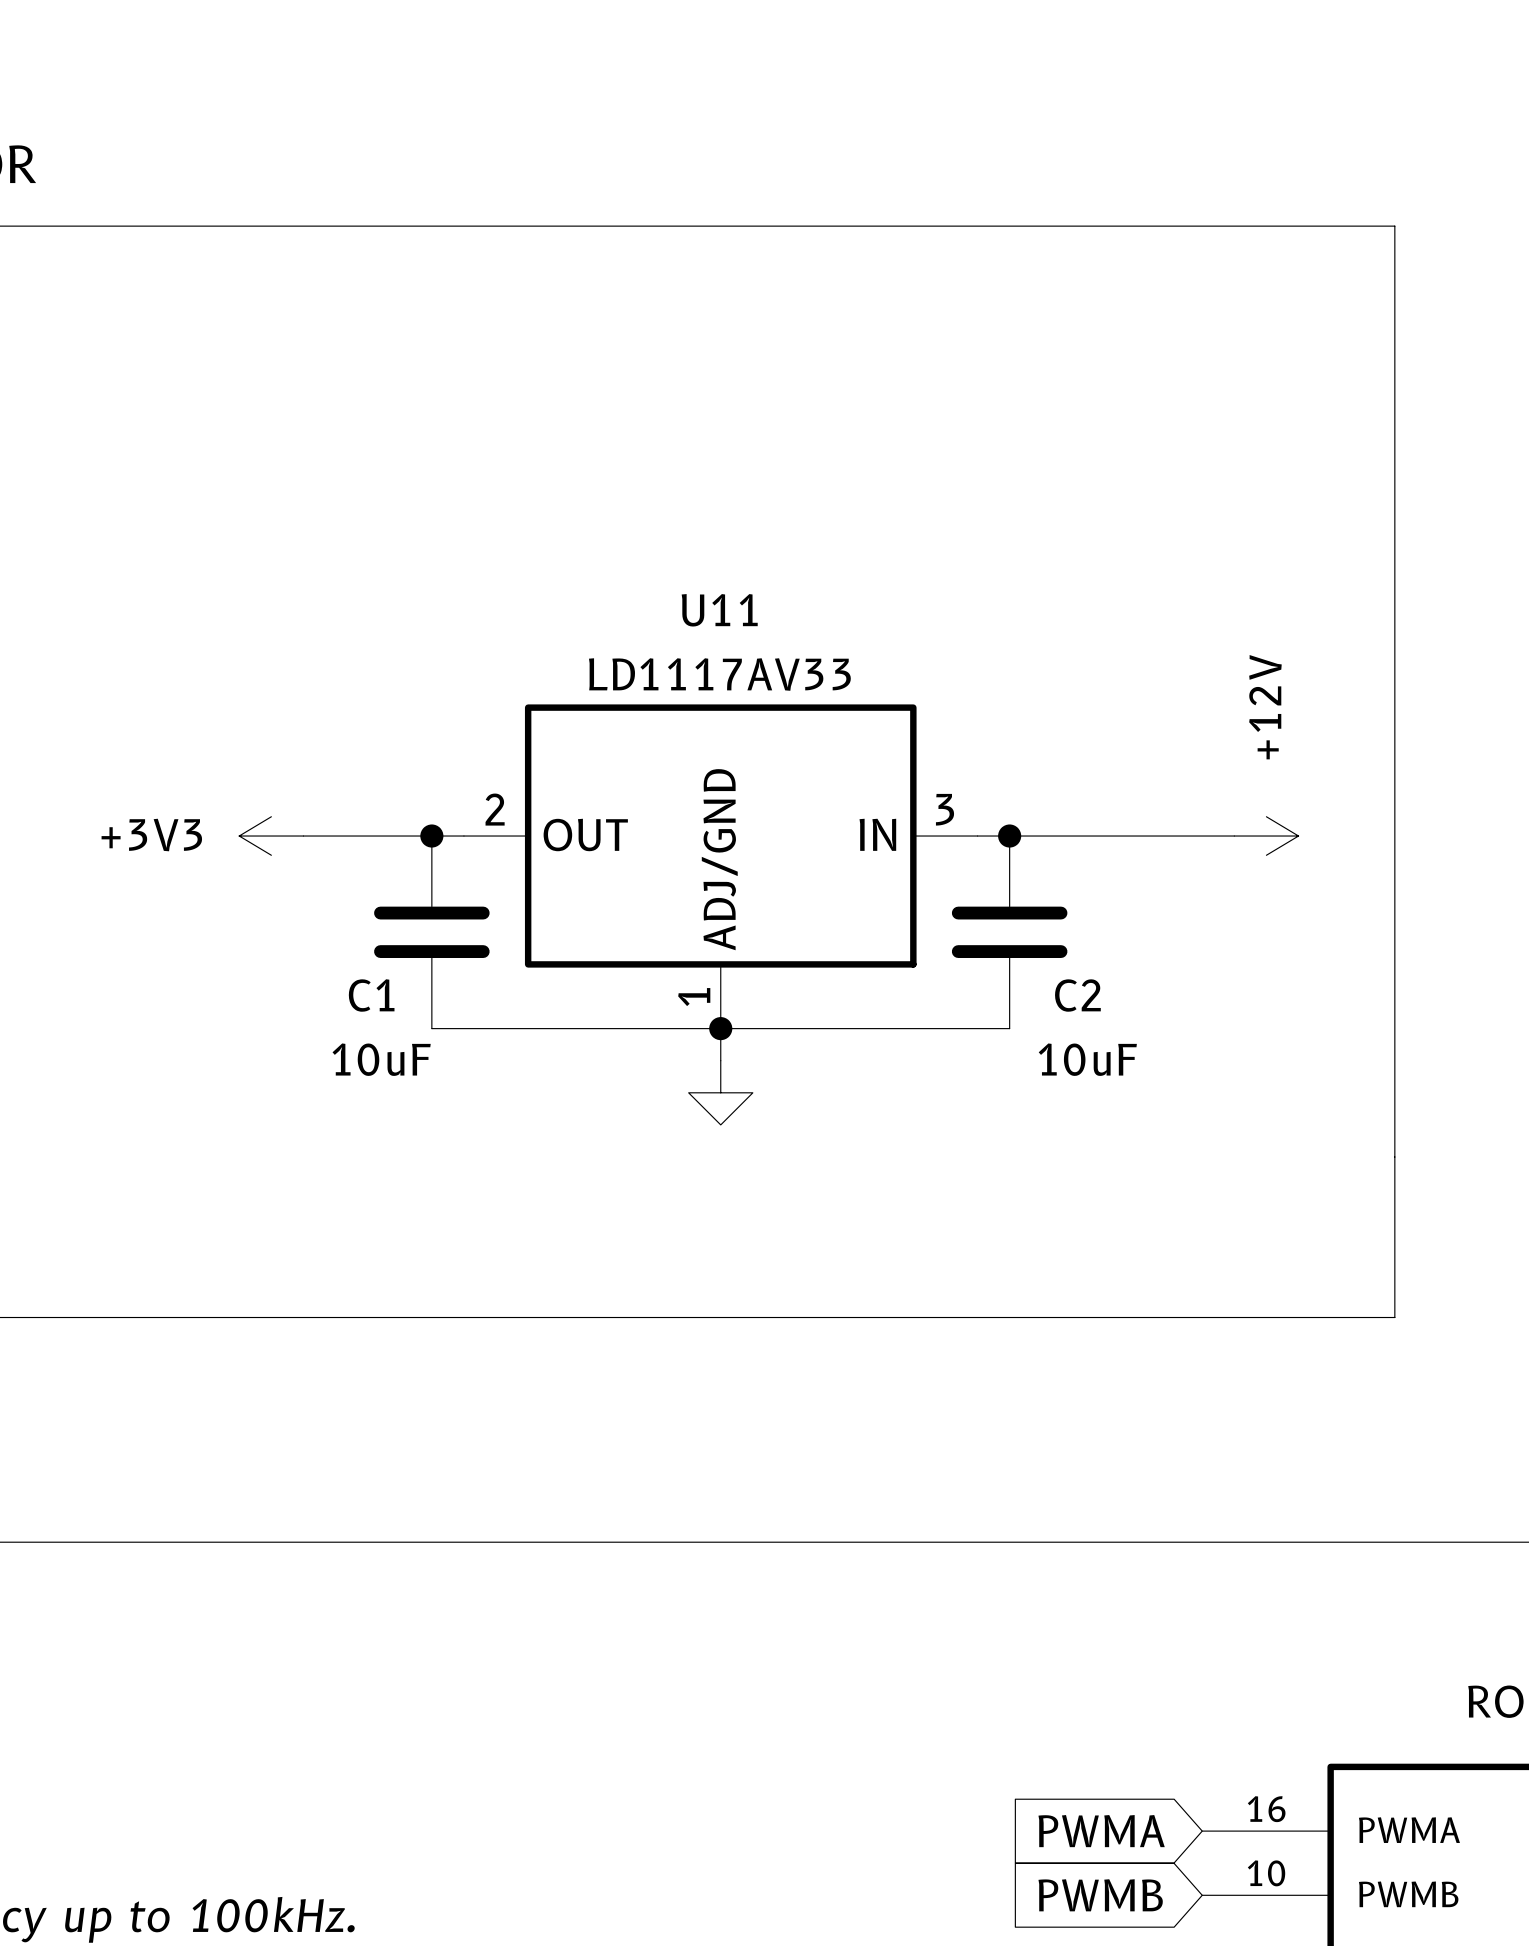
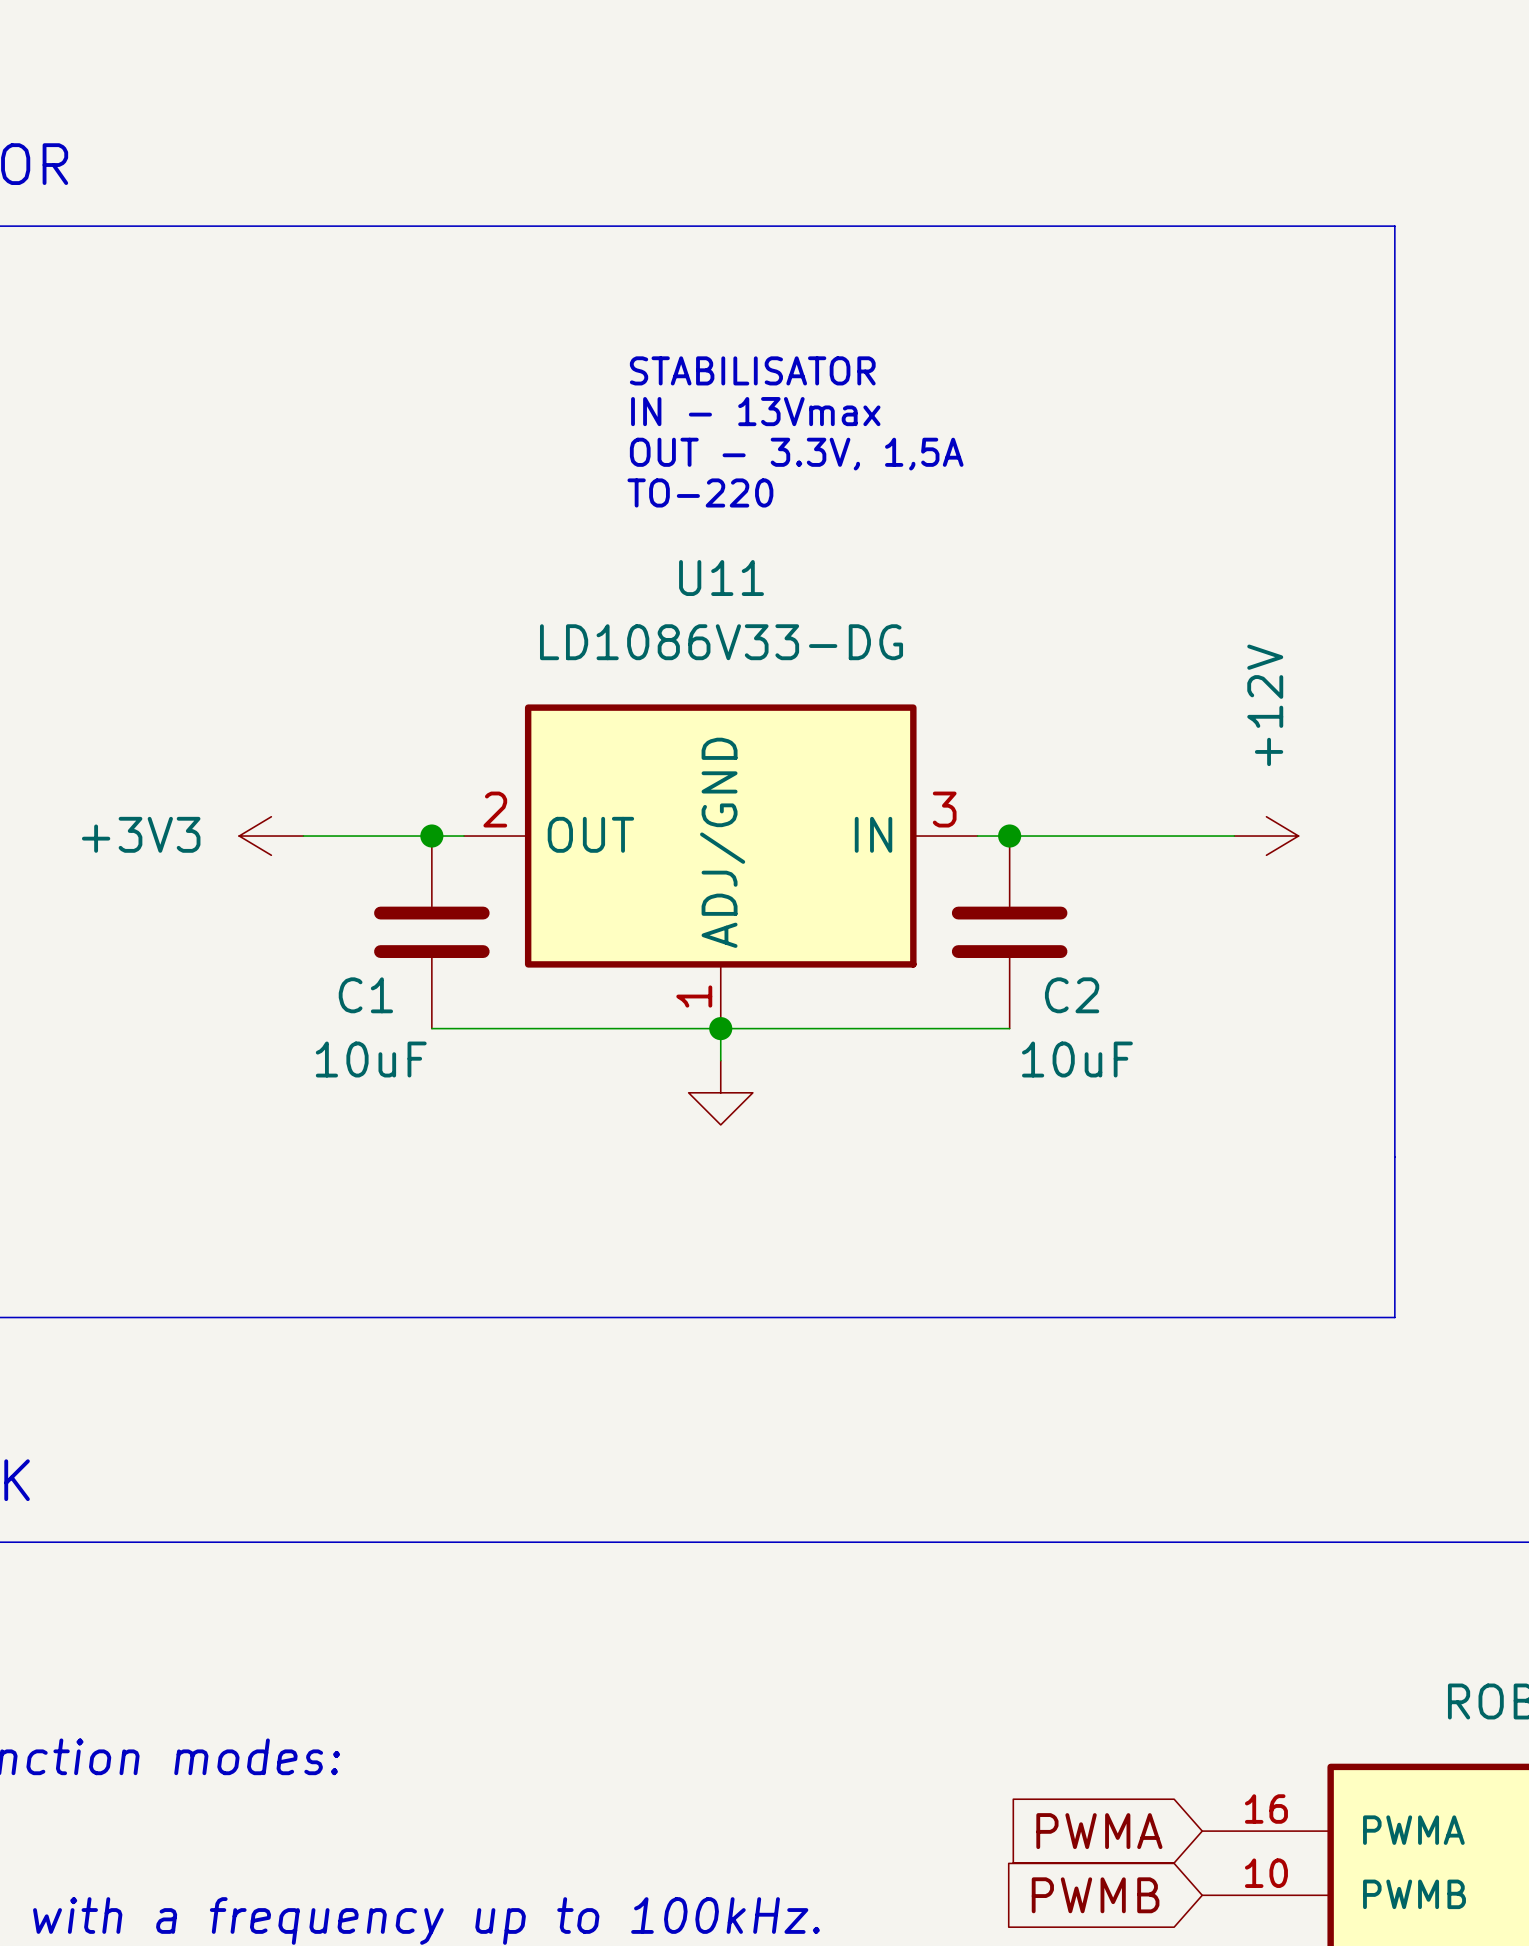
text: none -> STABILISATOR (752, 370)
text: none -> IN - 13Vmax (755, 411)
text: none -> OUT - 3.3V, 1,5A (796, 454)
text: none -> TO-220 (700, 492)
U11 name position: U11 (719, 610) -> U11 (721, 578)
U11 value: LD1117AV33 (719, 674) -> LD1086V33-DG (721, 642)

